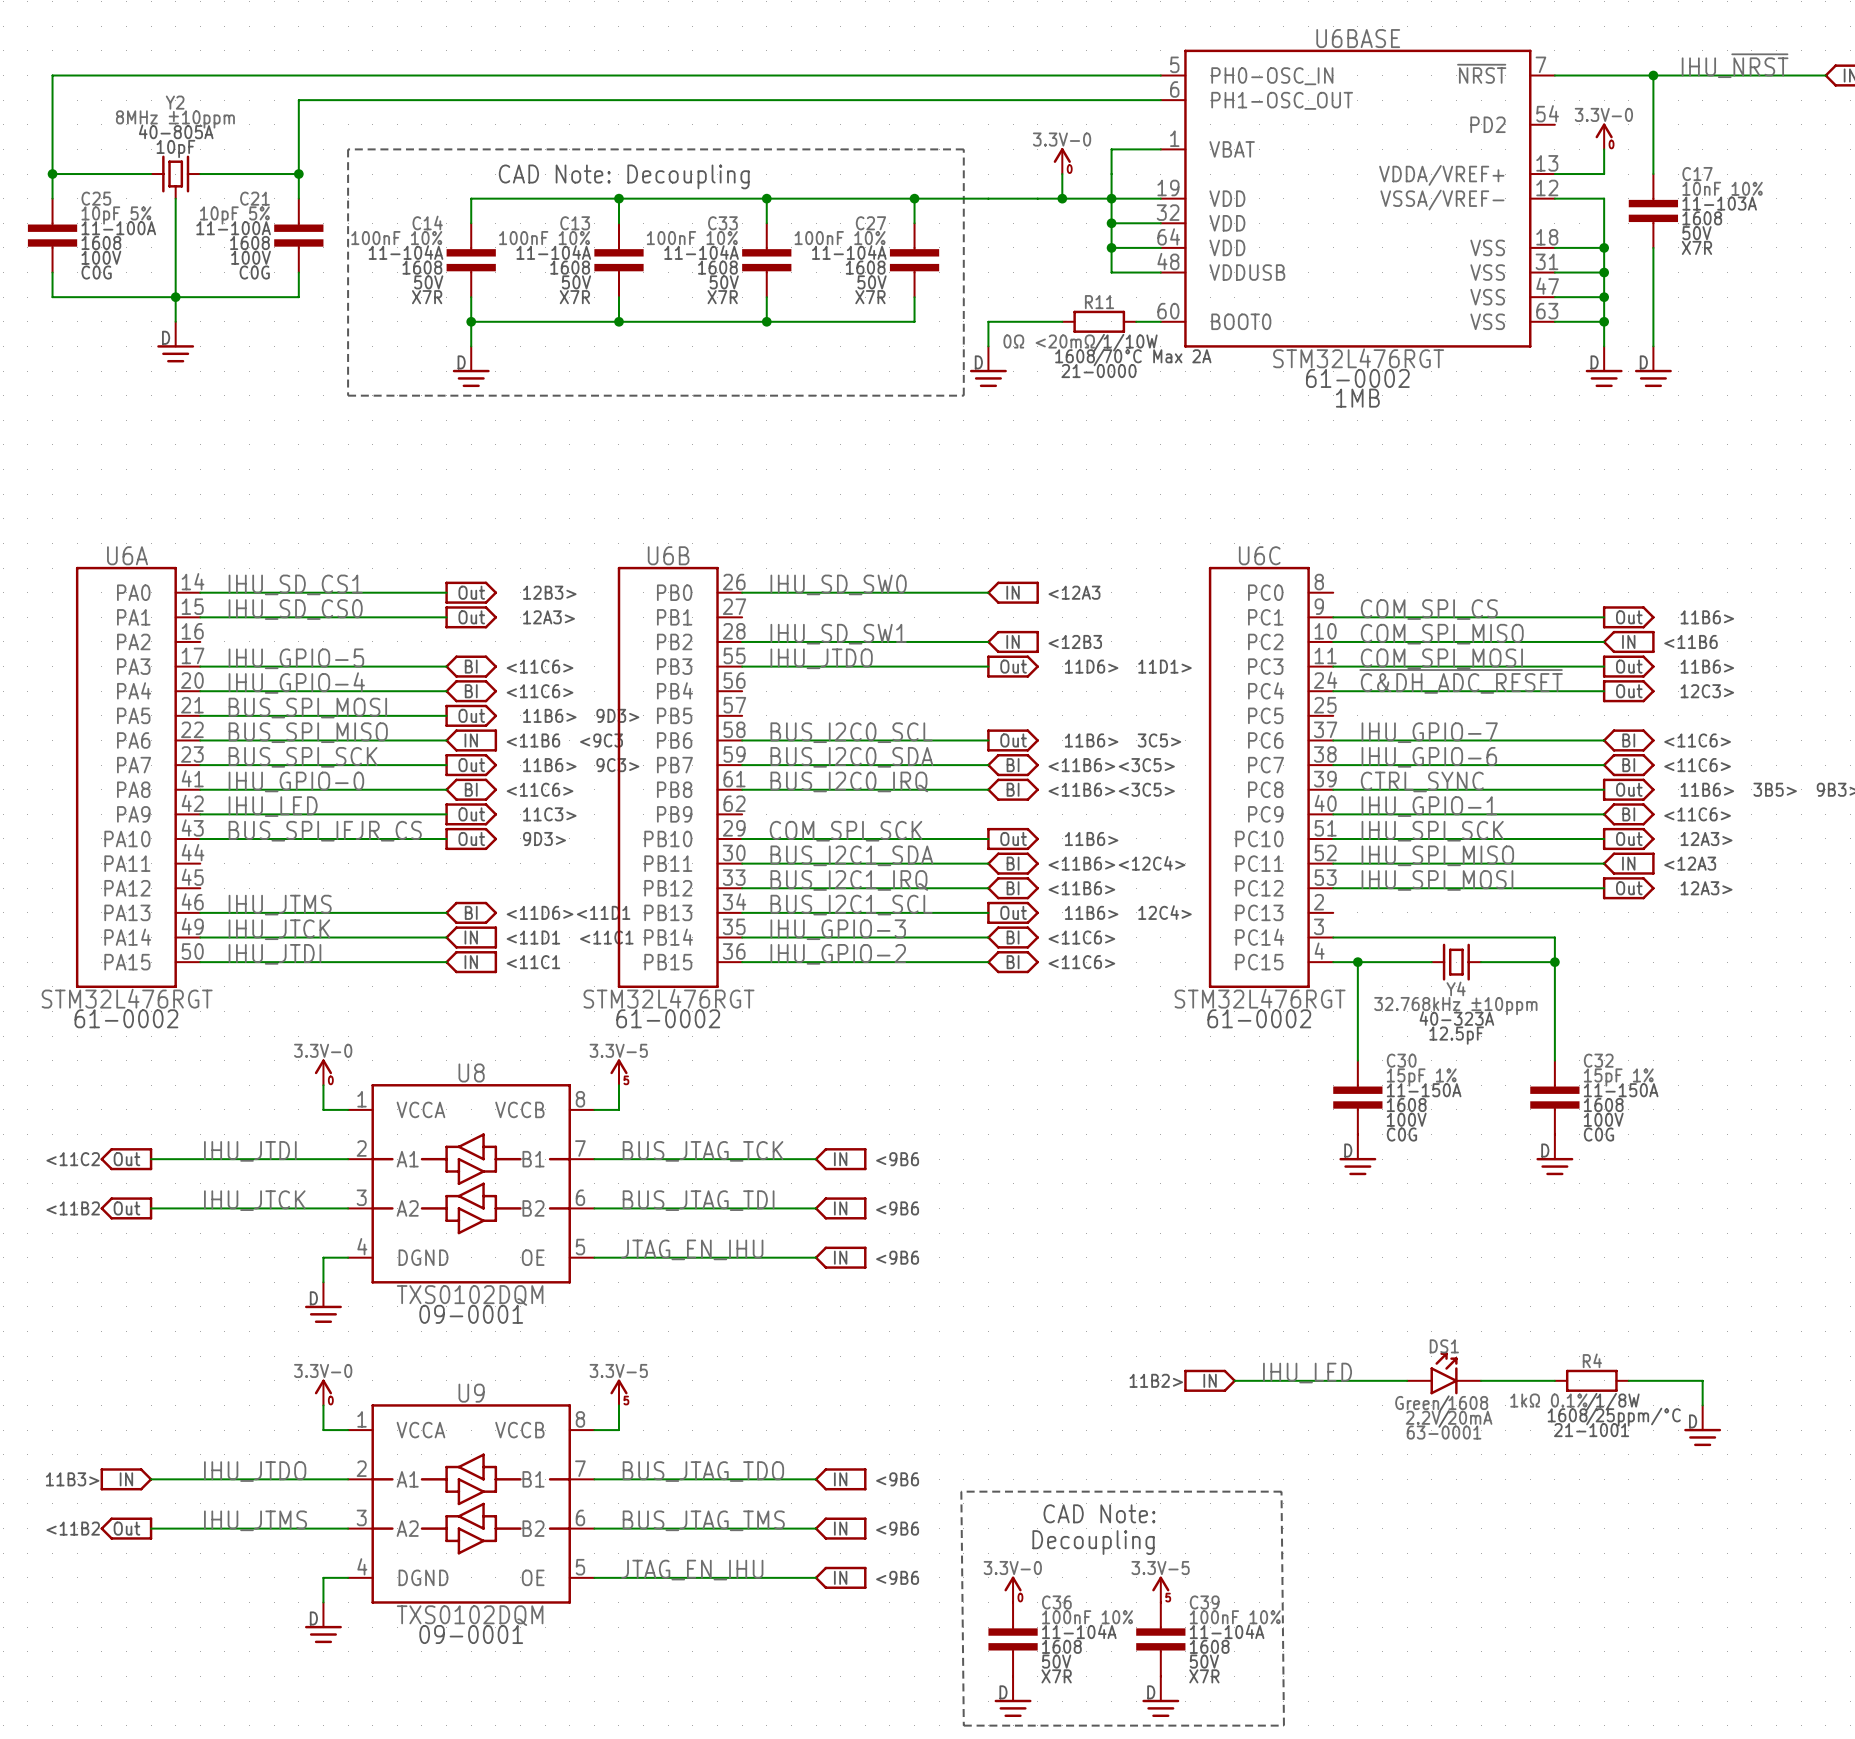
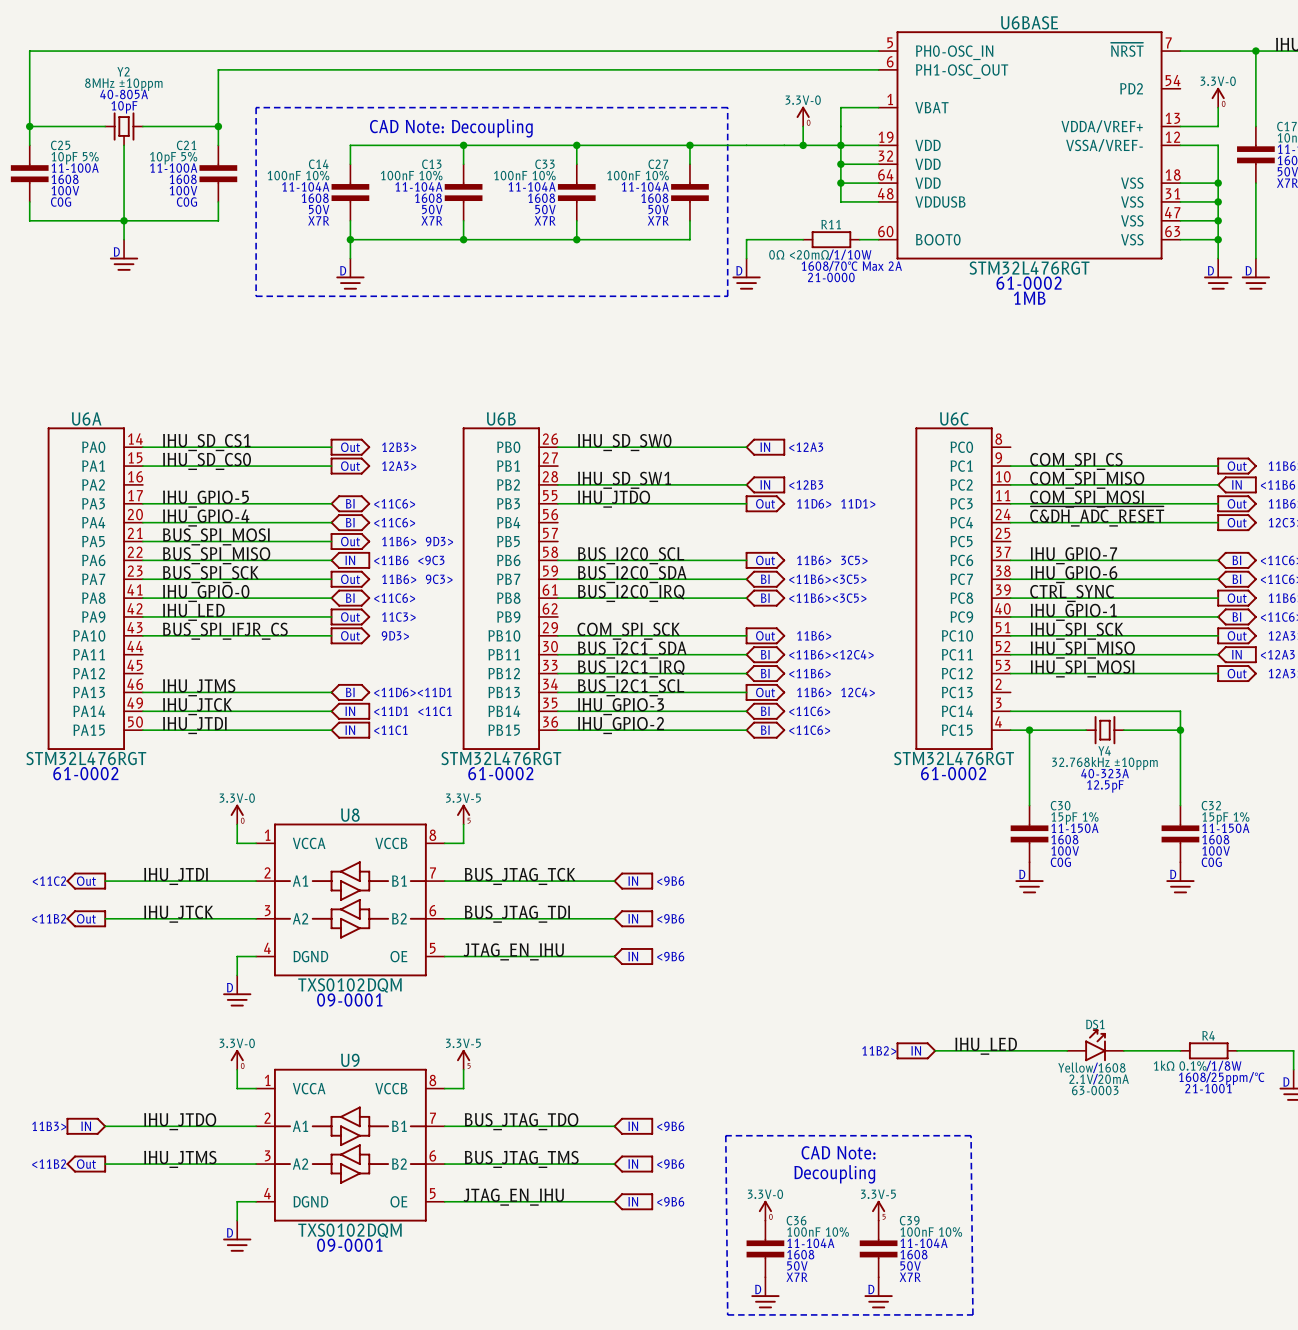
DS1 value: Green (1417, 1402) -> Yellow (1075, 1067)
DS1 text: 2.2V (1423, 1417) -> 2.1V (1081, 1079)
DS1 text: 63-0001 (1444, 1432) -> 63-0003 (1095, 1090)

